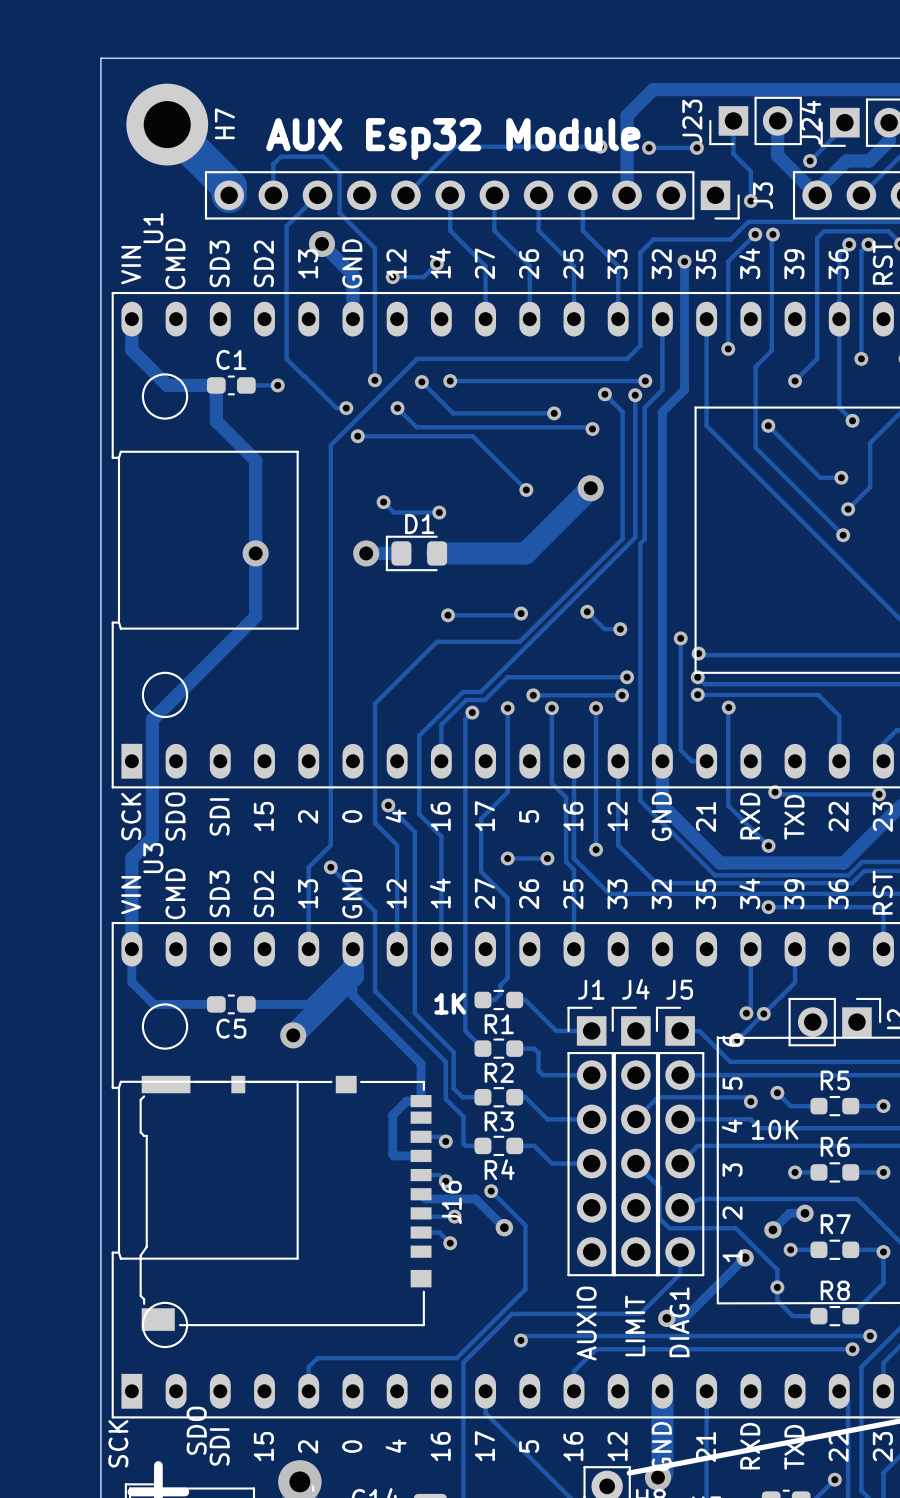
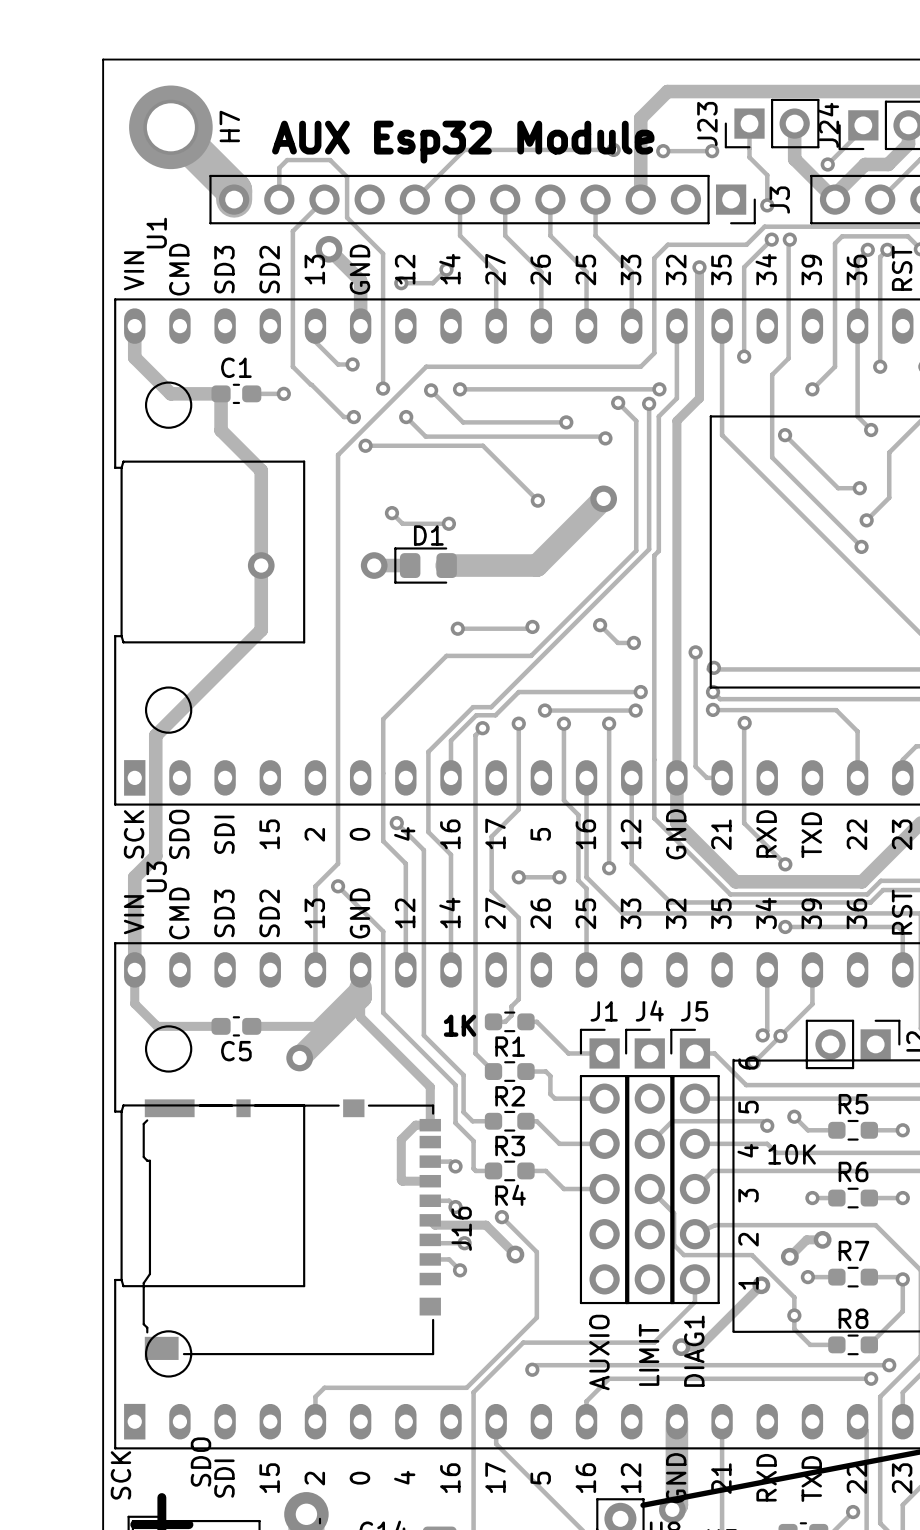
track: none -> (315, 326) (315, 341) (338, 364) (352, 364)
via: none -> (352, 364)
track: (775, 792) (777, 794) (879, 794) -> none
via: (775, 792) -> none
via: (879, 794) -> none

